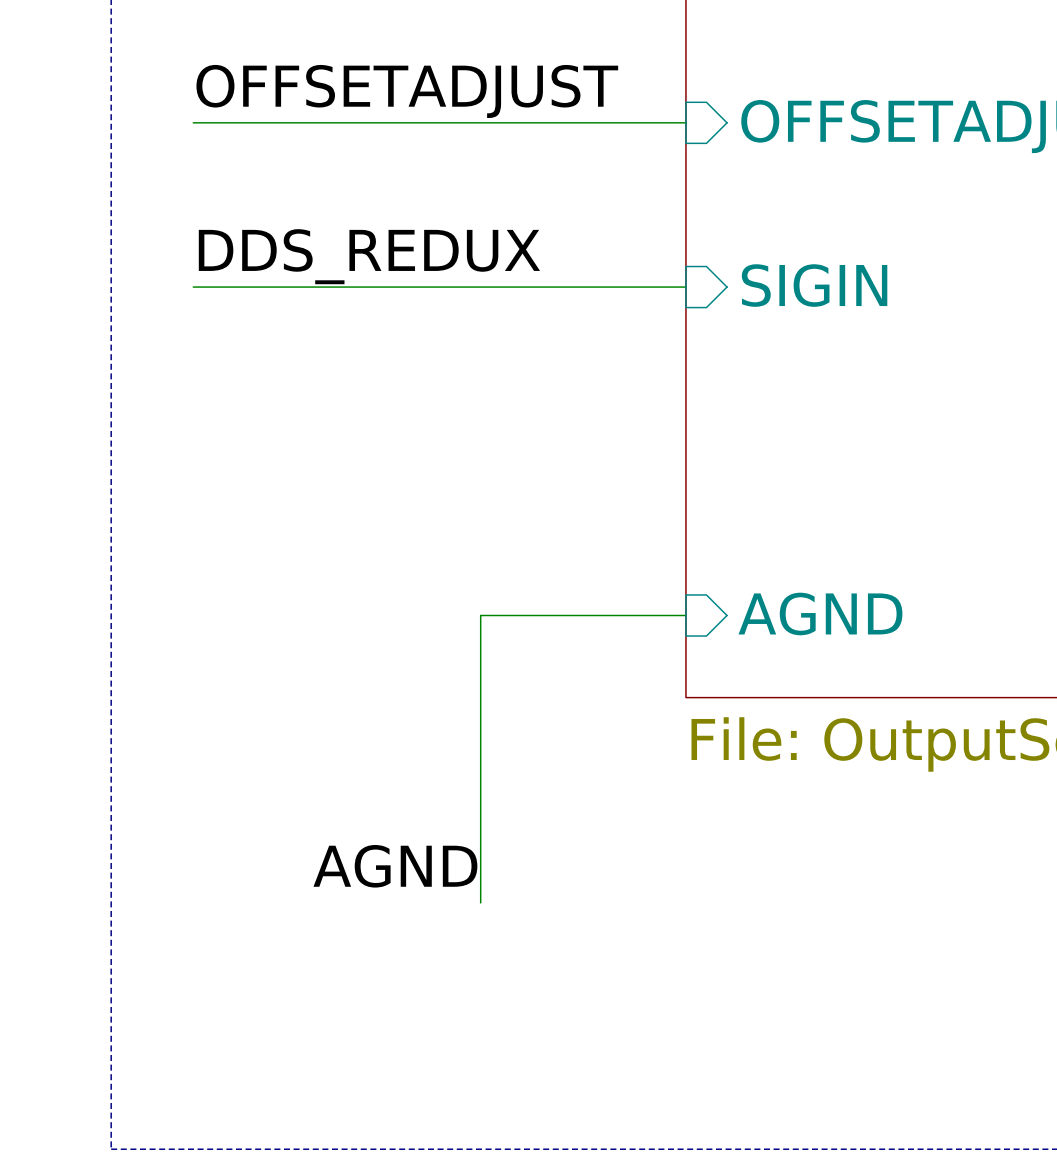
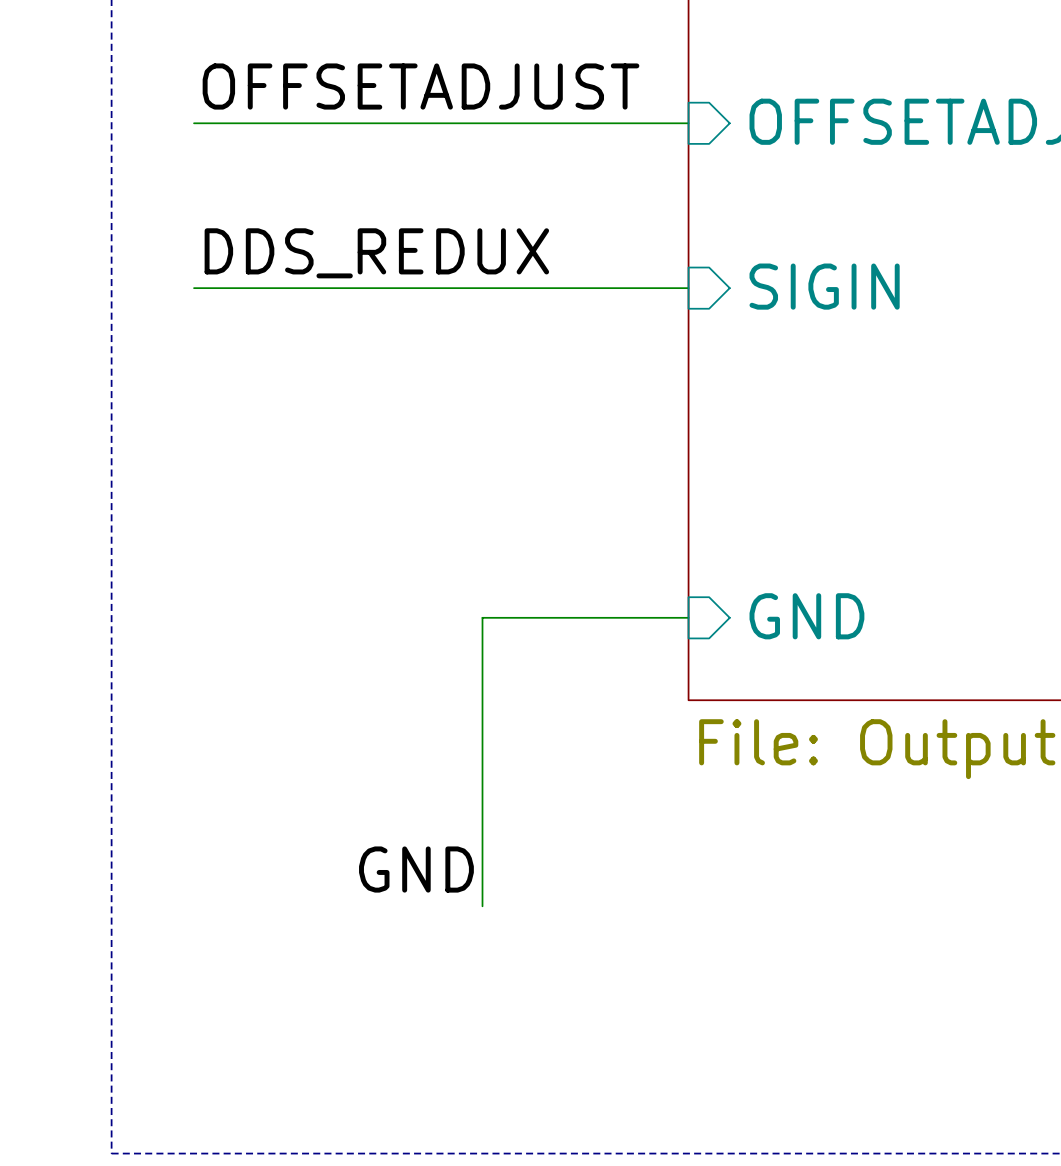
sheet pin: AGND (820, 613) -> GND (806, 616)
label: AGND (395, 866) -> GND (416, 869)

